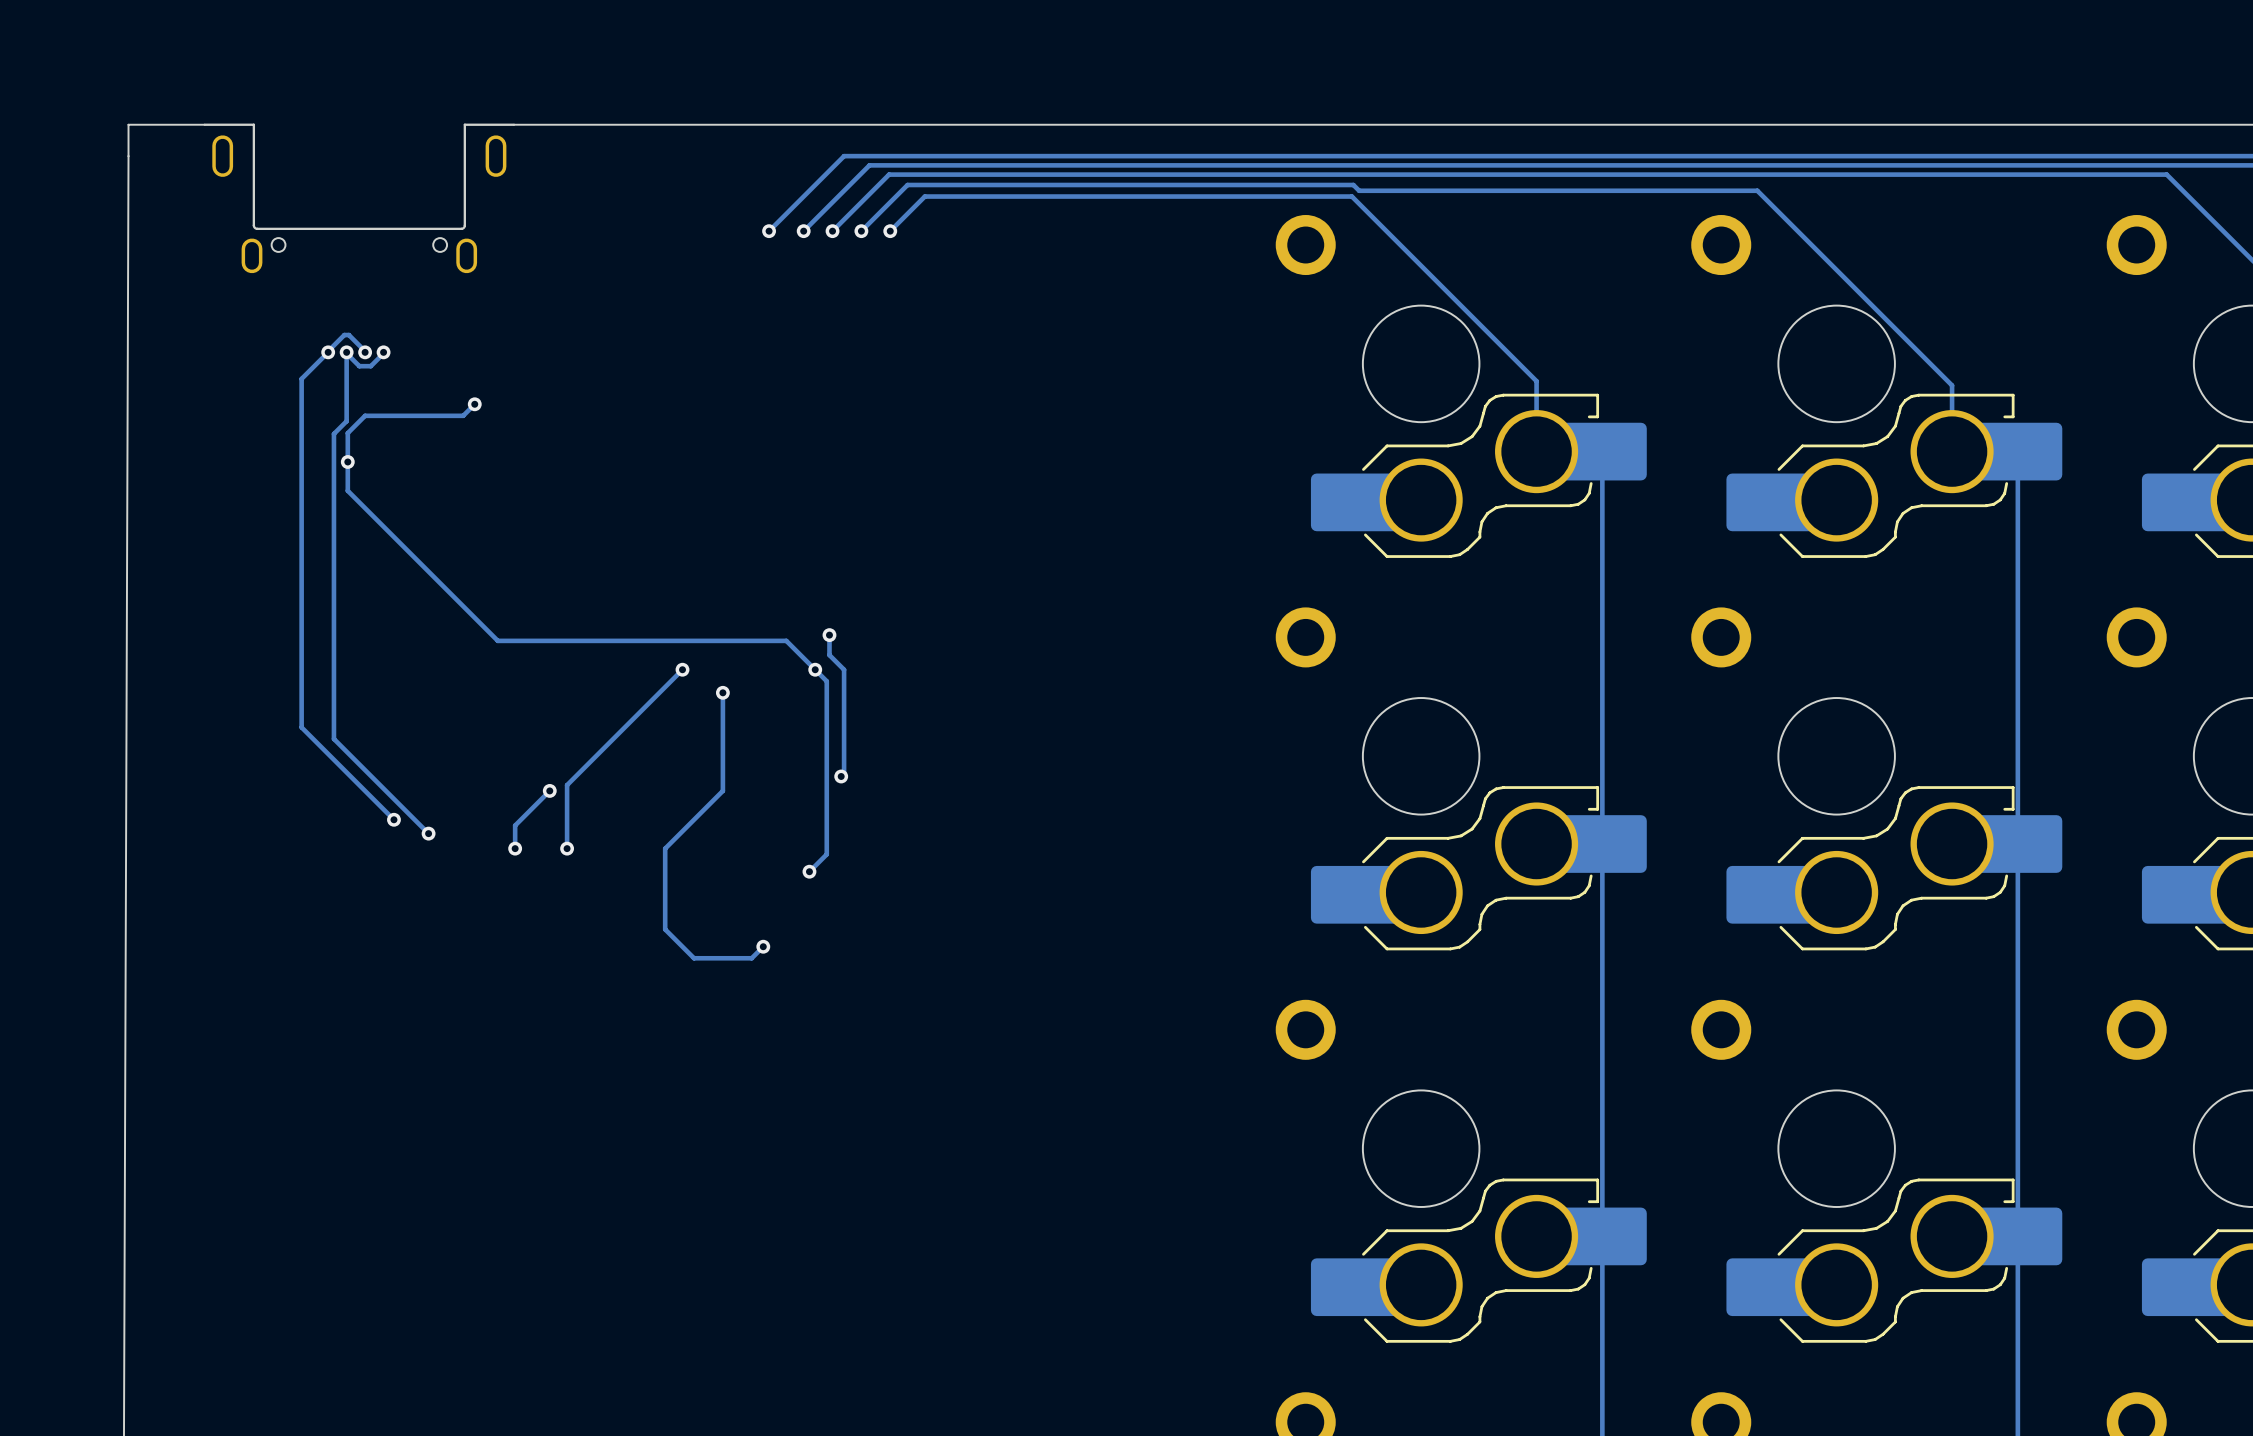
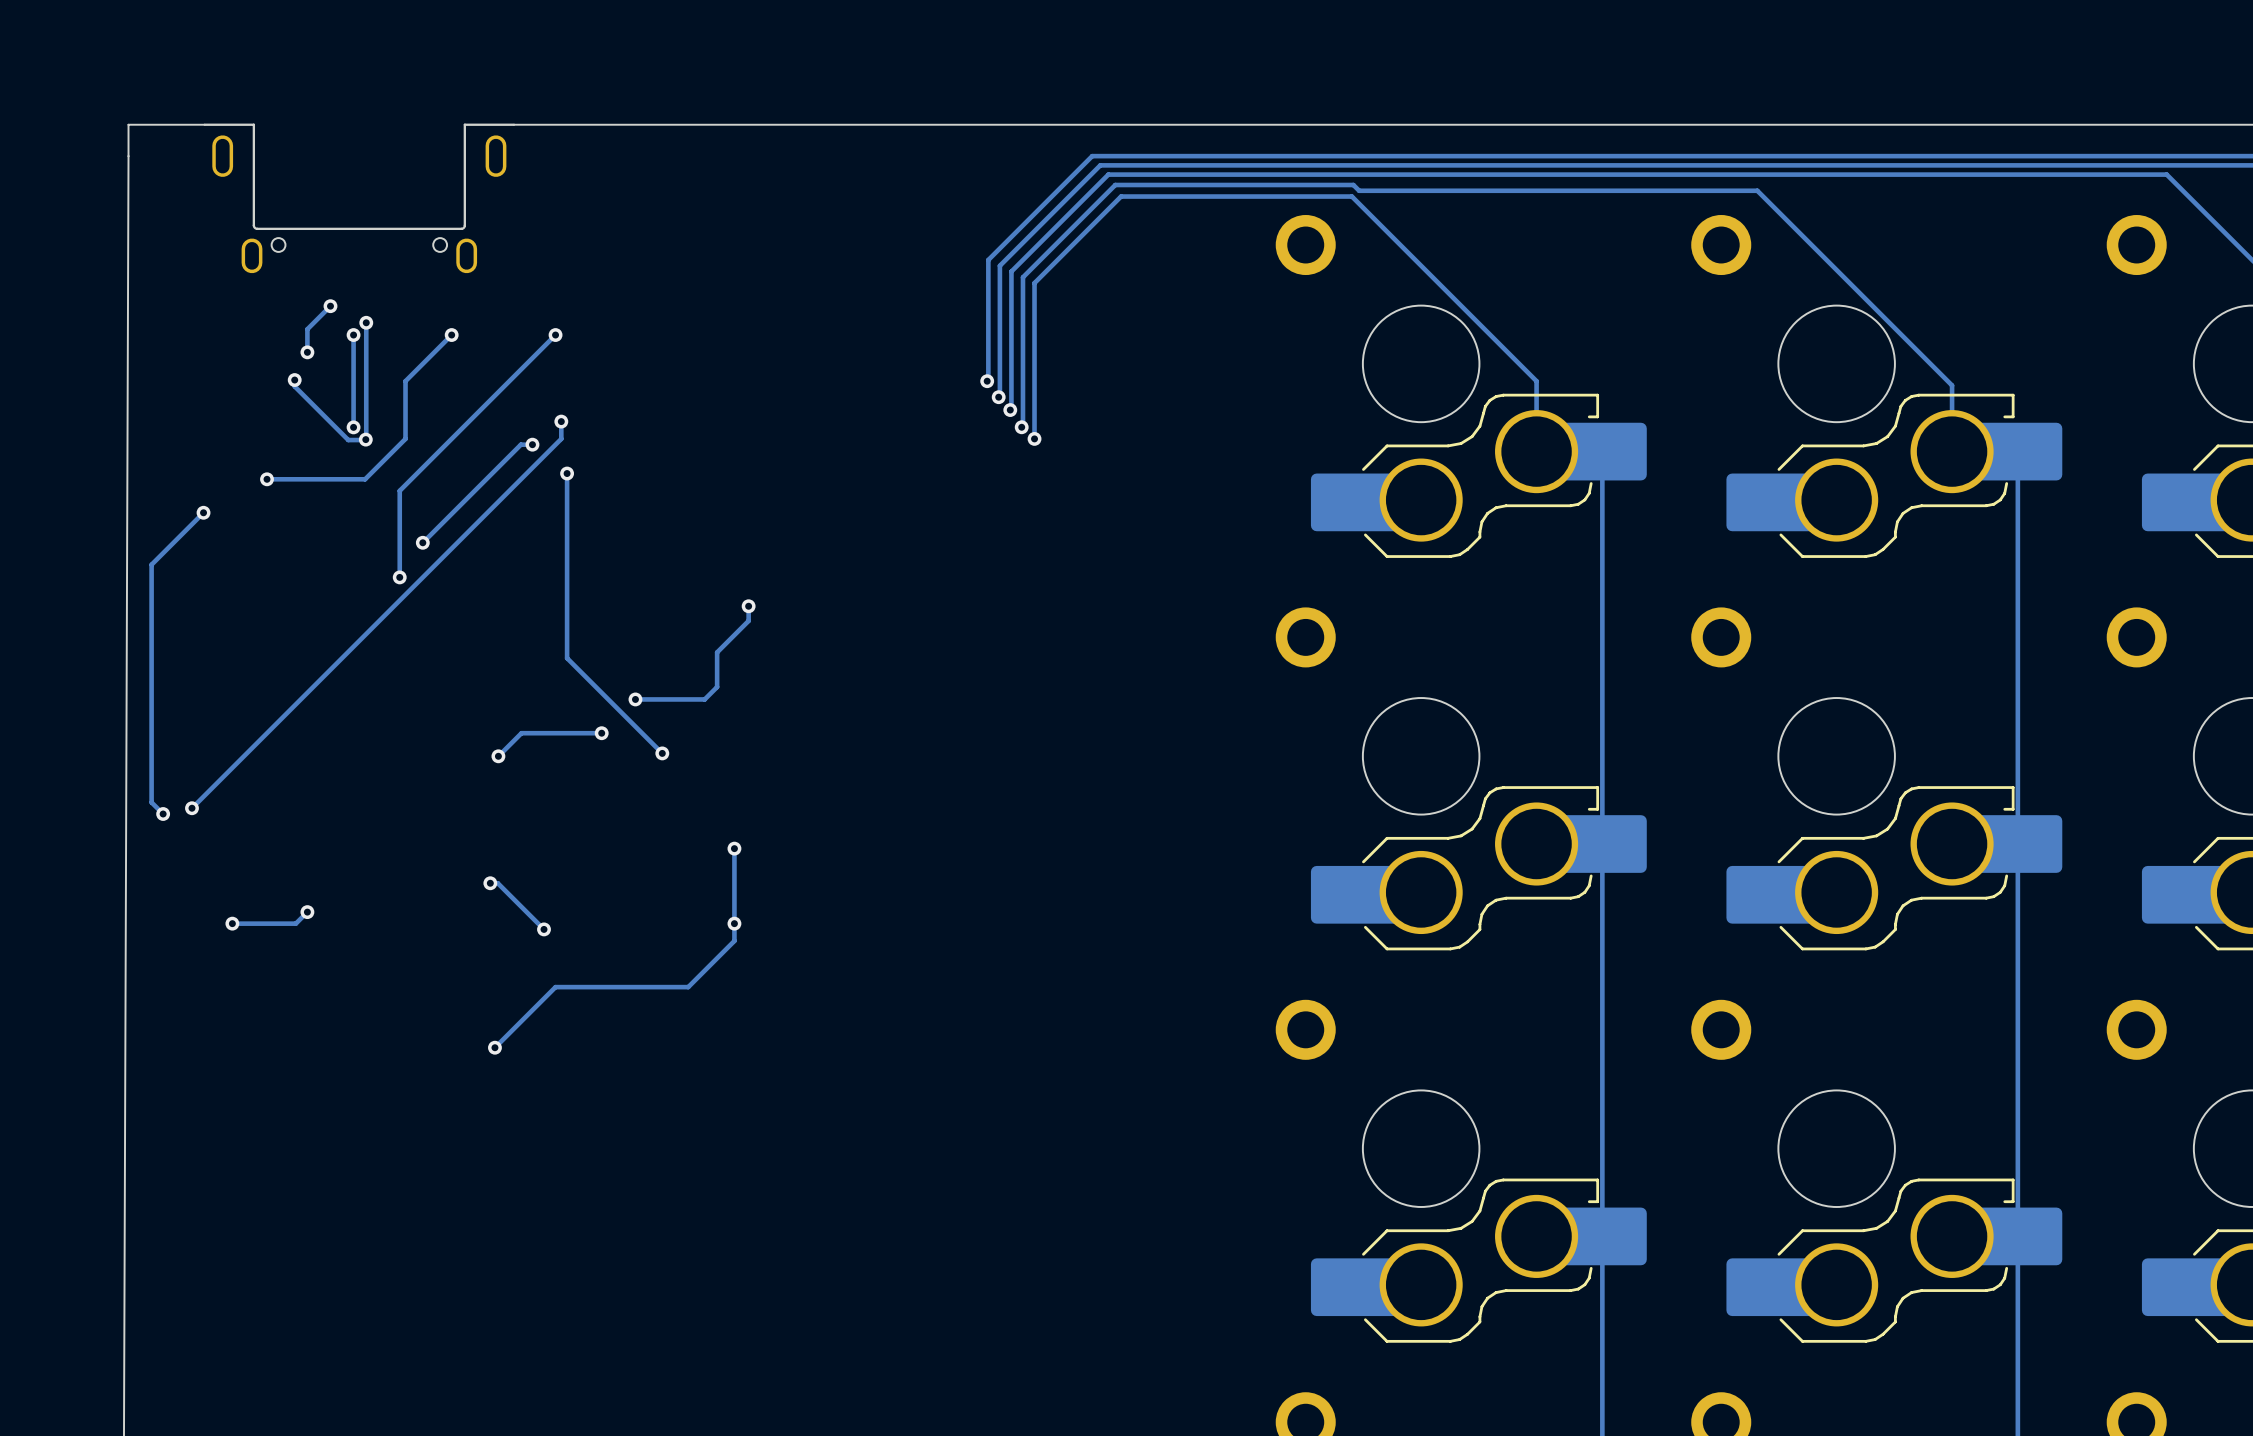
track: (1092, 156) (844, 156) (769, 231) -> (1092, 156) (988, 260) (987, 381)
track: (1100, 165) (869, 165) (803, 231) -> (1100, 165) (999, 265) (998, 397)
track: (1108, 174) (889, 174) (832, 231) -> (1108, 174) (1011, 271) (1010, 410)
track: (1115, 184) (907, 184) (861, 231) -> (1115, 184) (1022, 277) (1021, 427)
track: (1121, 196) (924, 196) (890, 231) -> (1121, 196) (1034, 283) (1034, 438)
via: (769, 231) -> none
via: (803, 231) -> none
via: (832, 231) -> none
via: (861, 231) -> none
via: (890, 231) -> none
track: none -> (330, 306) (307, 329) (307, 352)
via: none -> (330, 306)
track: none -> (366, 322) (365, 440) (348, 440) (294, 386) (294, 380)
via: none -> (366, 322)
track: none -> (353, 335) (353, 427)
via: none -> (353, 335)
track: none -> (451, 335) (405, 381) (405, 438) (365, 479) (267, 479)
via: none -> (451, 335)
track: none -> (555, 335) (399, 490) (399, 577)
via: none -> (555, 335)
via: none -> (307, 352)
via: (328, 352) -> none
track: (346, 352) (346, 421) (333, 433) (333, 738) (428, 833) -> none
via: (346, 352) -> none
track: (365, 352) (348, 335) (344, 335) (301, 378) (301, 727) (393, 819) -> none
via: (365, 352) -> none
track: (383, 352) (370, 366) (359, 366) (346, 353) -> none
via: (383, 352) -> none
via: none -> (294, 380)
via: none -> (987, 381)
via: none -> (998, 397)
track: (474, 404) (463, 415) (365, 415) (347, 433) (347, 490) (497, 640) (786, 640) (826, 681) (826, 854) (809, 871) -> none
via: (474, 404) -> none
via: none -> (1010, 410)
track: none -> (561, 421) (561, 438) (191, 808)
via: none -> (561, 421)
via: none -> (353, 427)
via: none -> (1021, 427)
via: none -> (1034, 438)
via: none -> (365, 439)
track: none -> (532, 444) (520, 444) (422, 542)
via: none -> (532, 444)
via: (347, 461) -> none
track: none -> (567, 473) (567, 658) (662, 753)
via: none -> (567, 473)
via: none -> (267, 479)
track: none -> (203, 512) (151, 564) (151, 802) (163, 814)
via: none -> (203, 512)
via: none -> (422, 542)
via: none -> (399, 577)
track: none -> (748, 606) (748, 620) (717, 652) (717, 687) (704, 699) (635, 699)
via: none -> (748, 606)
track: (829, 635) (829, 655) (844, 669) (844, 773) (841, 776) -> none
via: (829, 635) -> none
track: (682, 669) (567, 785) (567, 848) -> none
via: (682, 669) -> none
via: (815, 669) -> none
track: (722, 692) (722, 790) (665, 848) (665, 929) (694, 958) (751, 958) (763, 946) -> none
via: (722, 692) -> none
via: none -> (635, 699)
track: none -> (601, 733) (521, 733) (498, 756)
via: none -> (601, 733)
via: none -> (662, 753)
via: none -> (498, 756)
via: (841, 776) -> none
track: (549, 790) (515, 825) (515, 848) -> none
via: (549, 790) -> none
via: none -> (191, 808)
via: none -> (163, 814)
via: (393, 819) -> none
via: (428, 833) -> none
via: (515, 848) -> none
via: (567, 848) -> none
track: none -> (734, 848) (734, 940) (688, 987) (555, 987) (494, 1047)
via: none -> (734, 848)
via: (809, 871) -> none
track: none -> (490, 883) (497, 883) (544, 929)
via: none -> (490, 883)
track: none -> (307, 912) (295, 923) (232, 923)
via: none -> (307, 912)
via: none -> (232, 923)
via: none -> (544, 929)
via position: (763, 946) -> (734, 923)
via: none -> (494, 1047)

